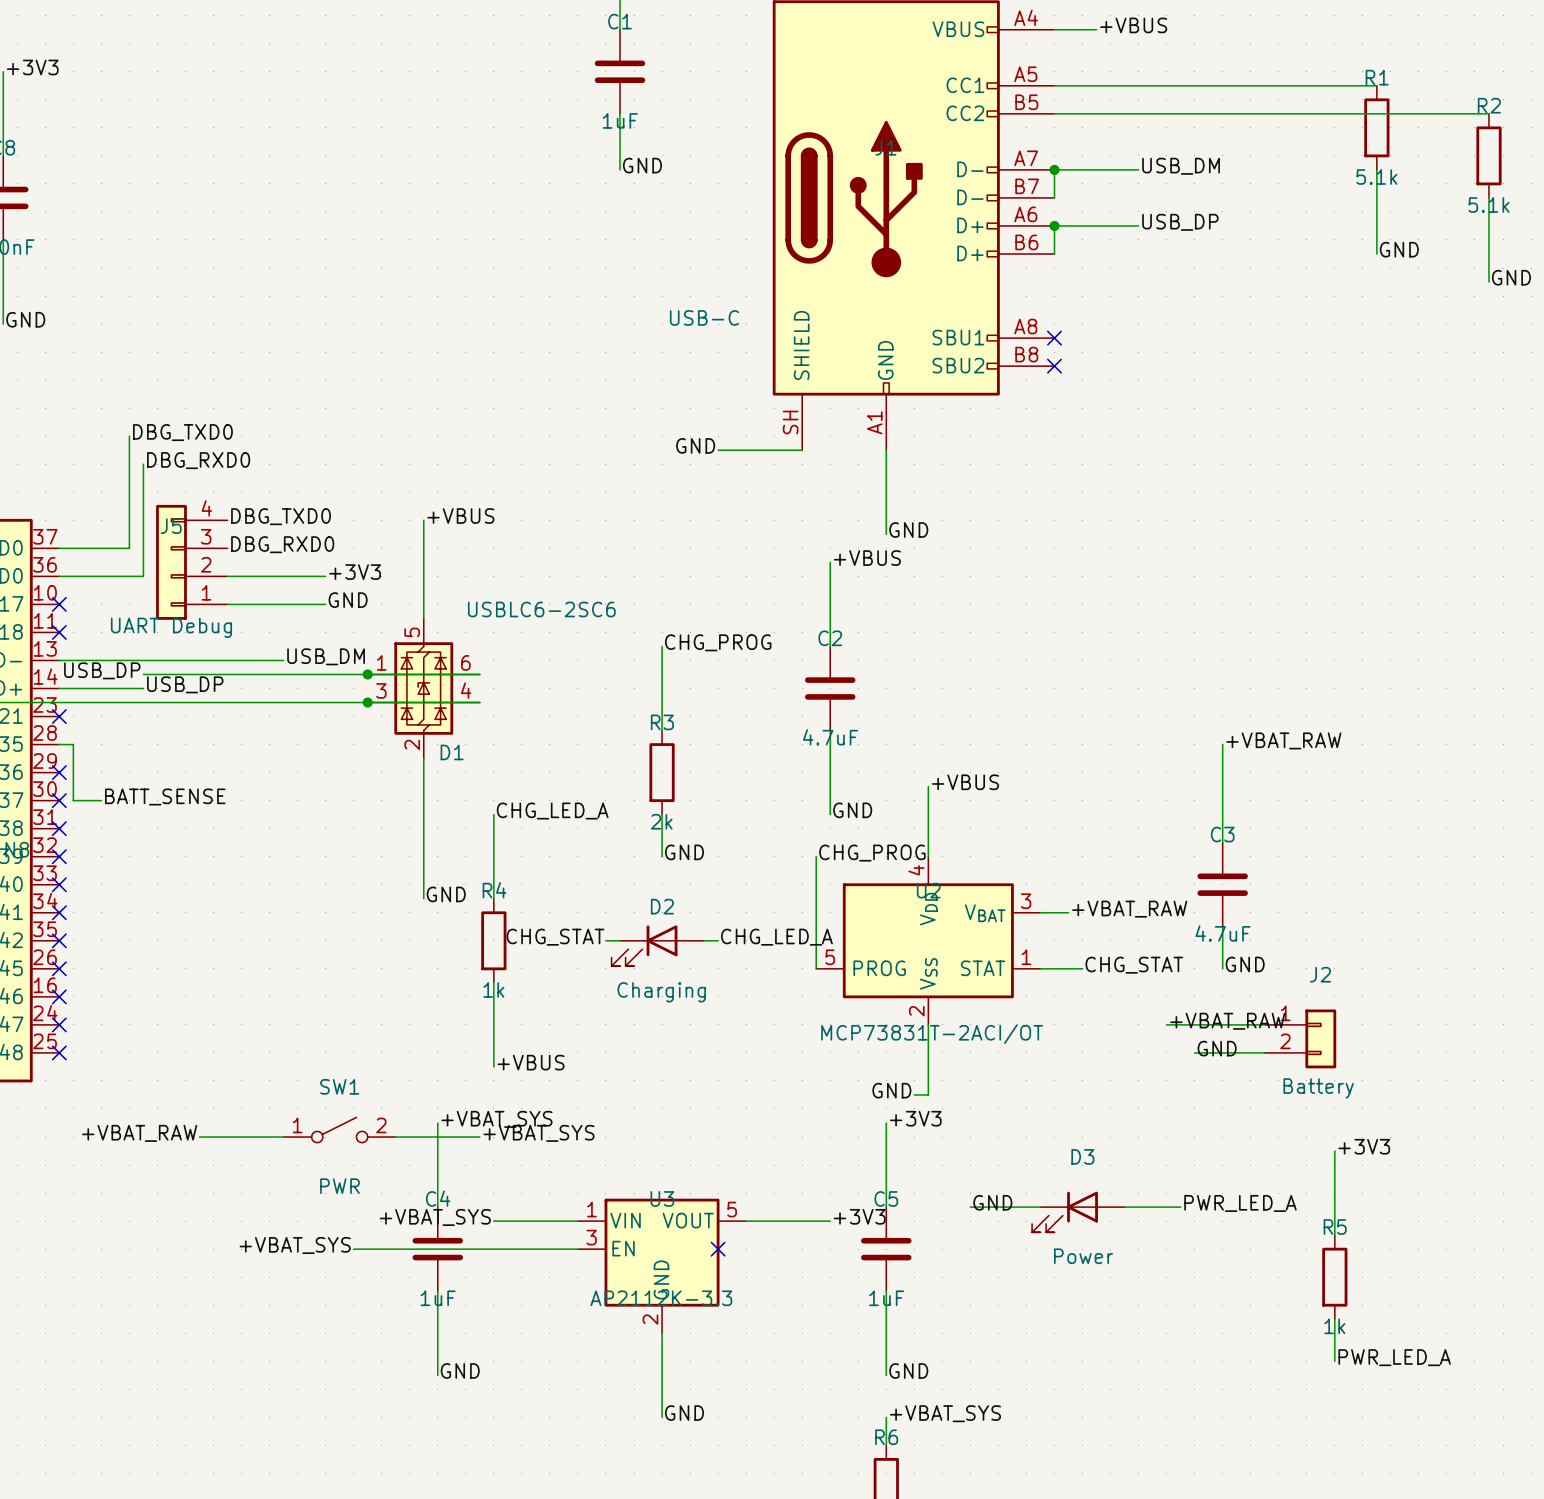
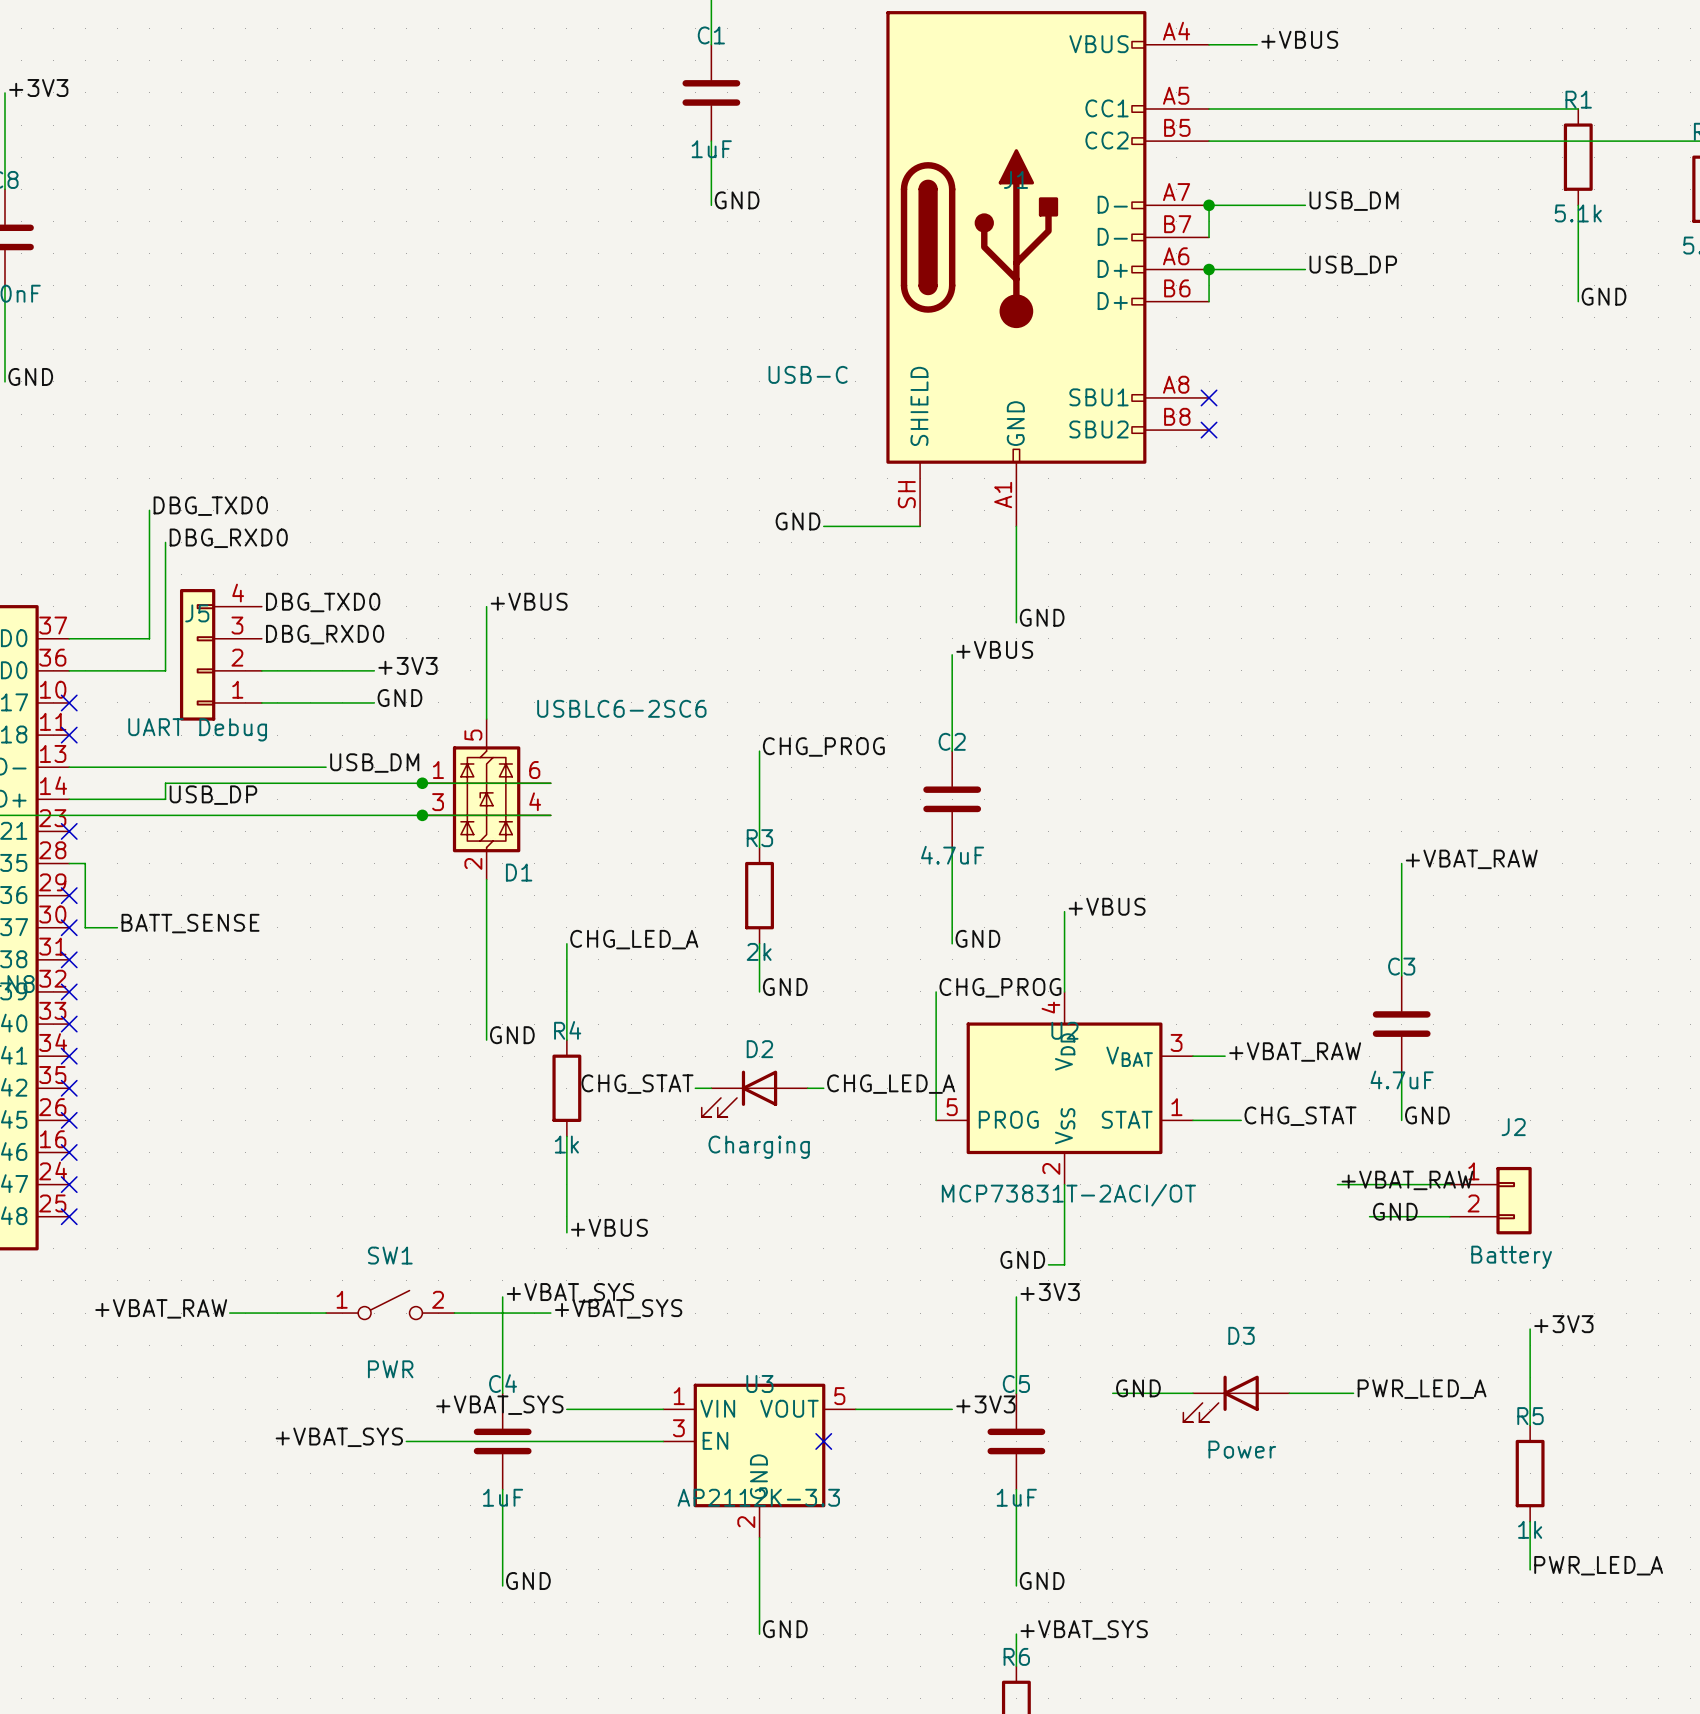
label: USB_DP (102, 670) -> none
wire: none -> (165, 783) (165, 799)

